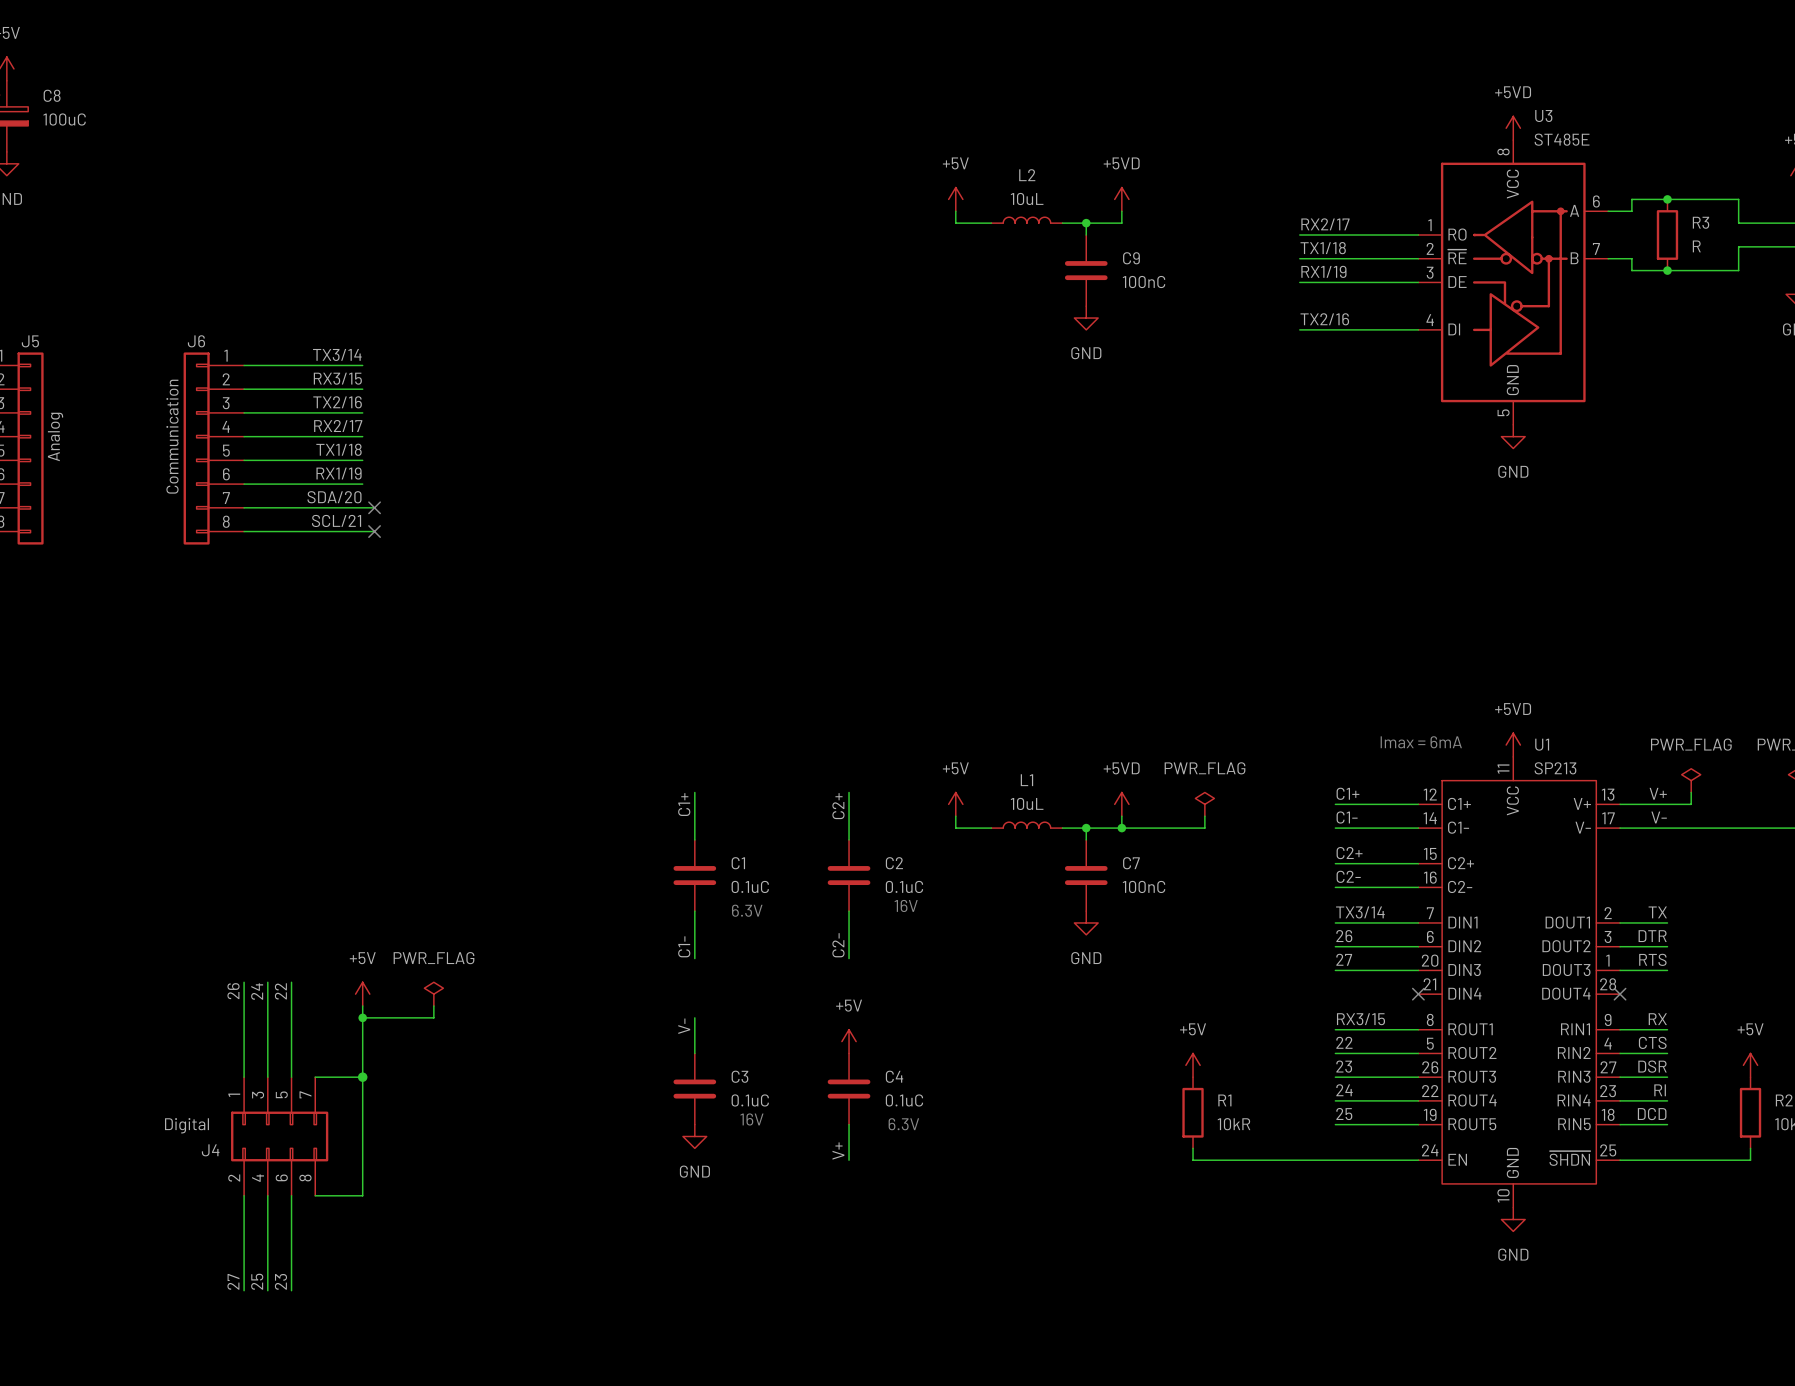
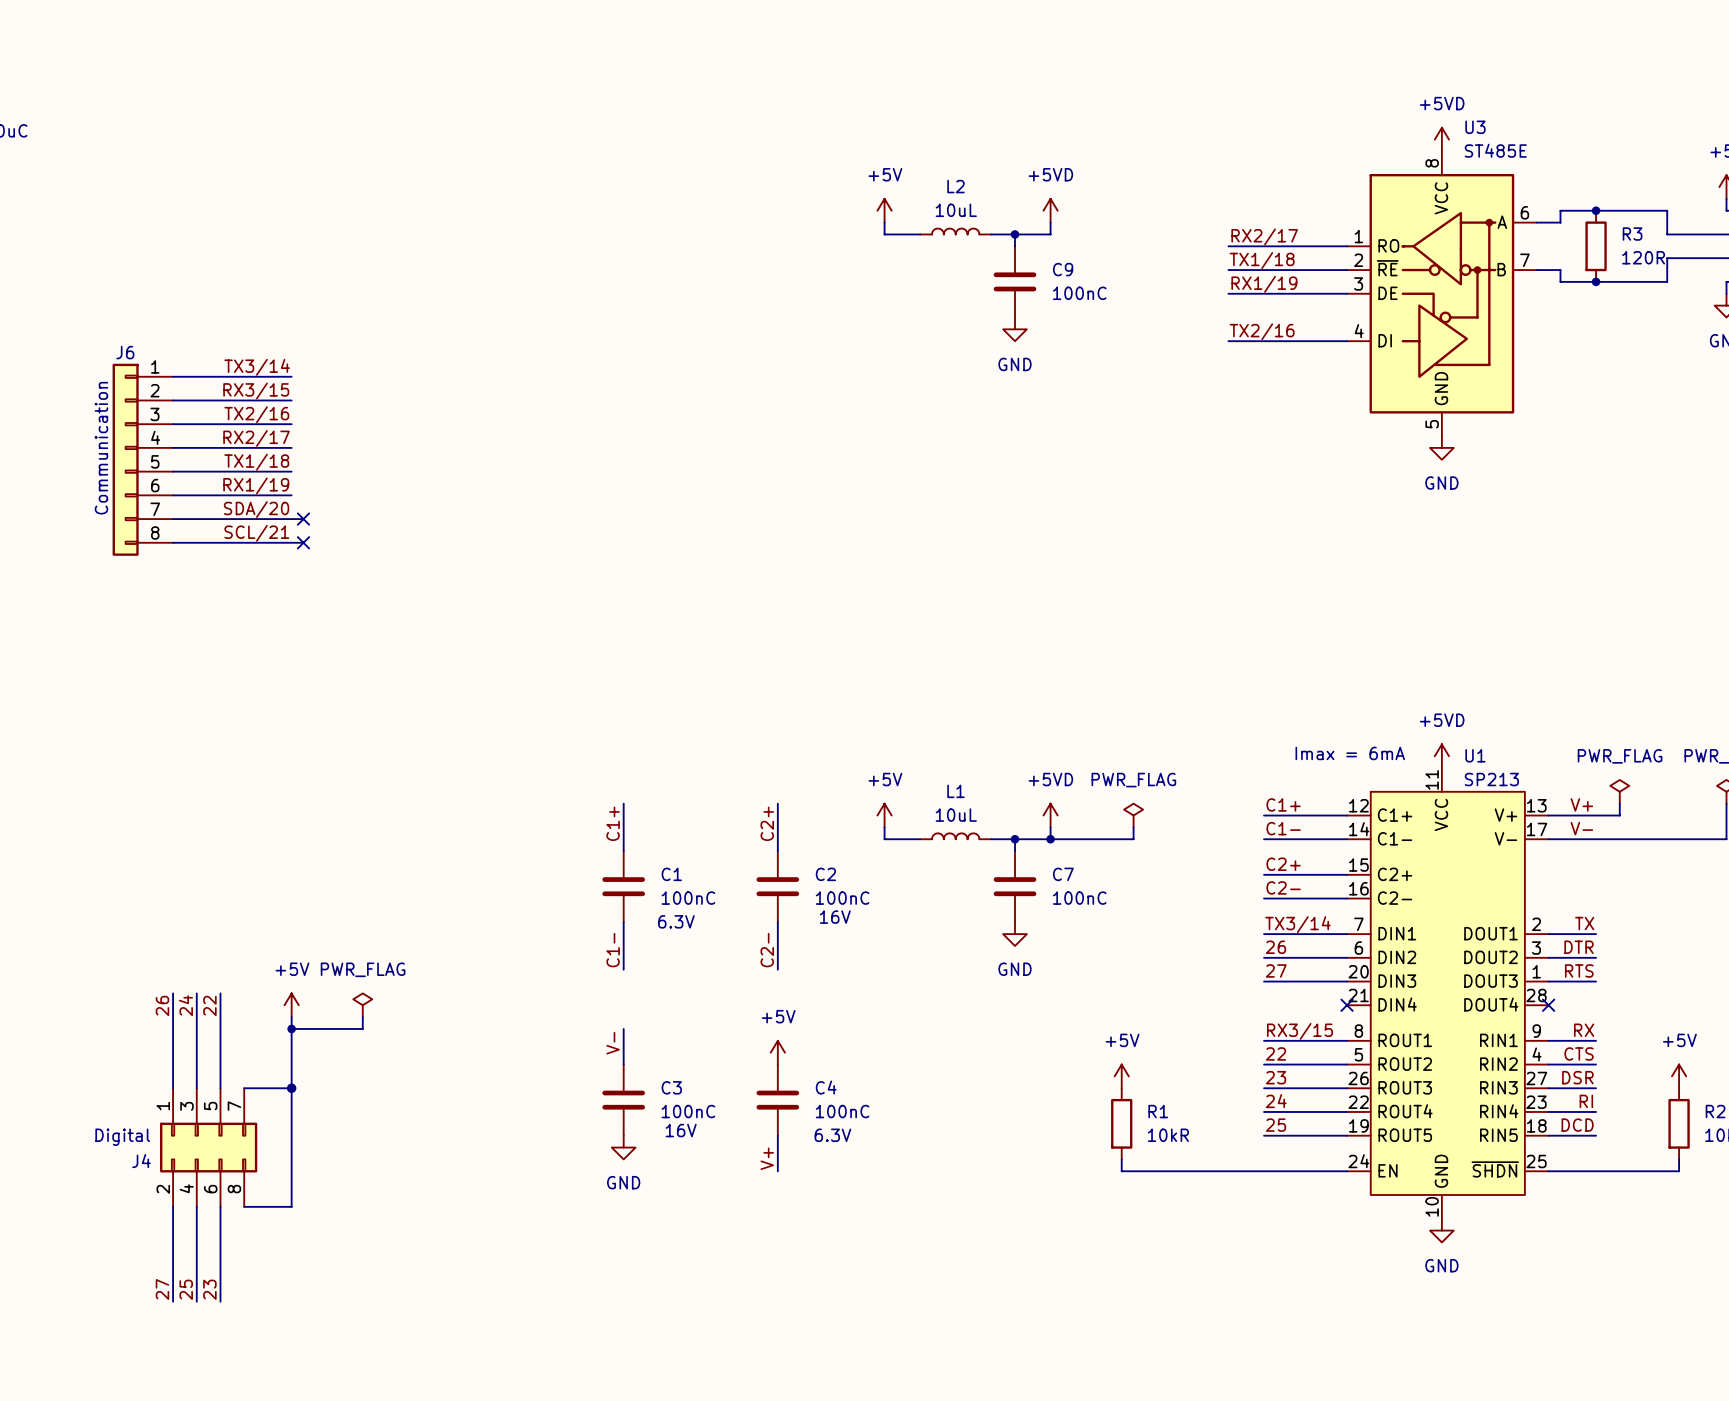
R3 value: R (1696, 246) -> 120R (1643, 257)
C1 value: 0.1uC (750, 886) -> 100nC (688, 898)
C2 value: 0.1uC (904, 886) -> 100nC (842, 898)
C3 value: 0.1uC (750, 1100) -> 100nC (688, 1111)
C4 value: 0.1uC (904, 1100) -> 100nC (842, 1111)

